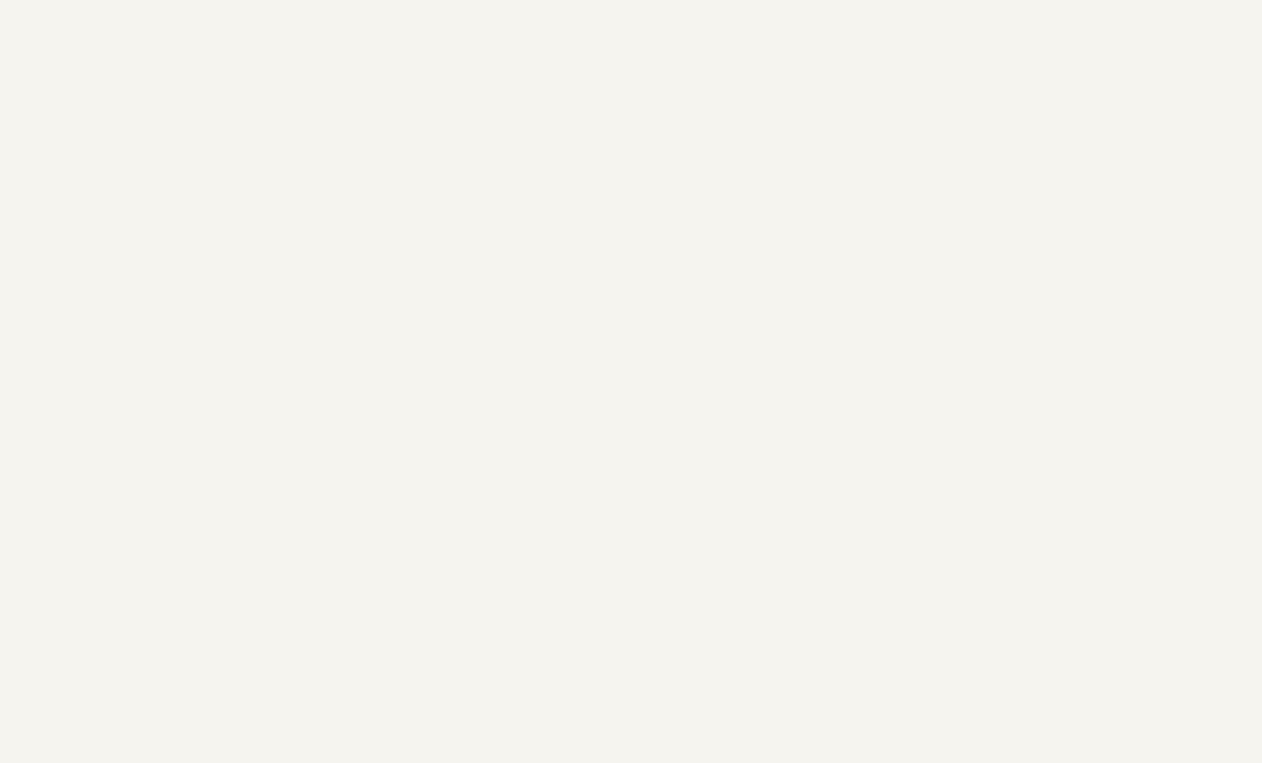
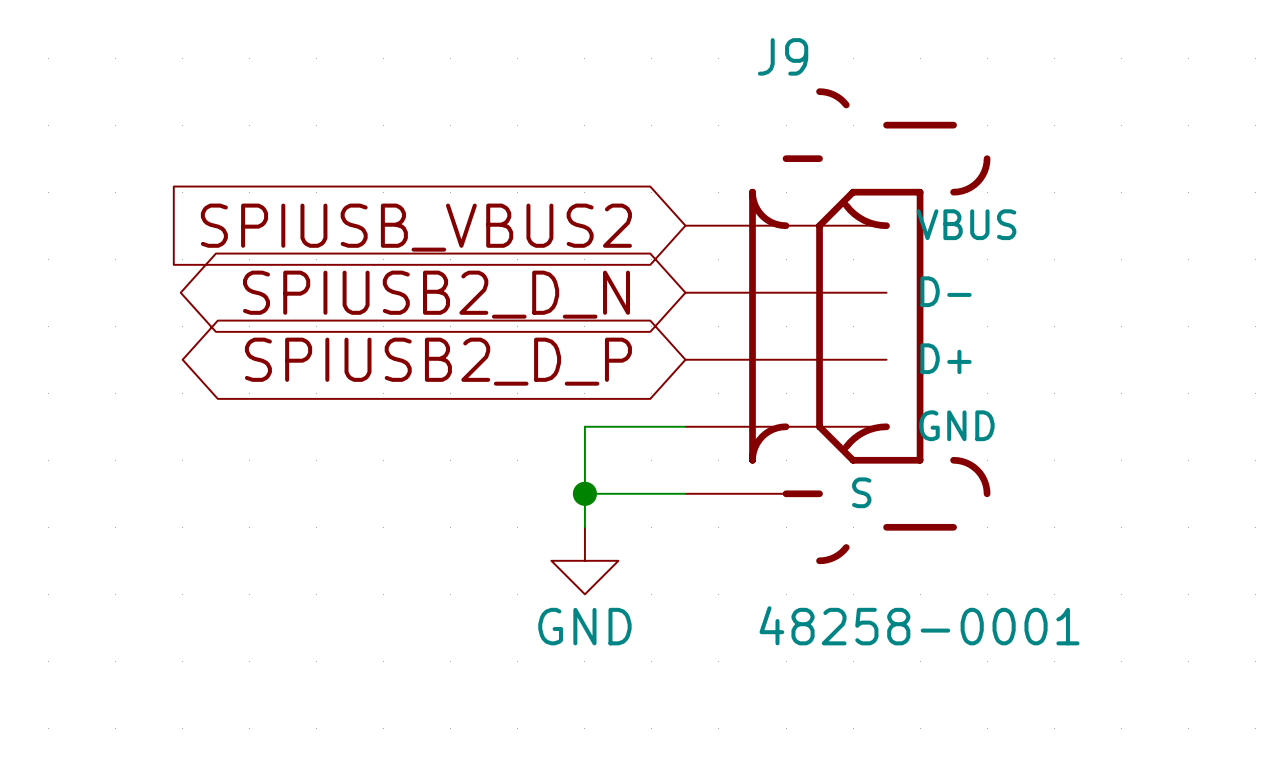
global label: none -> SPIUSB_VBUS2 (416, 227)
global label: none -> SPIUSB2_D_N (436, 294)
J9: none -> 48258-0001 (837, 326)
global label: none -> SPIUSB2_D_P (438, 361)
wire: none -> (685, 426) (584, 426) (584, 527)
wire: none -> (584, 493) (685, 493)
junction: none -> (584, 493)
power symbol: none -> GND (584, 560)

